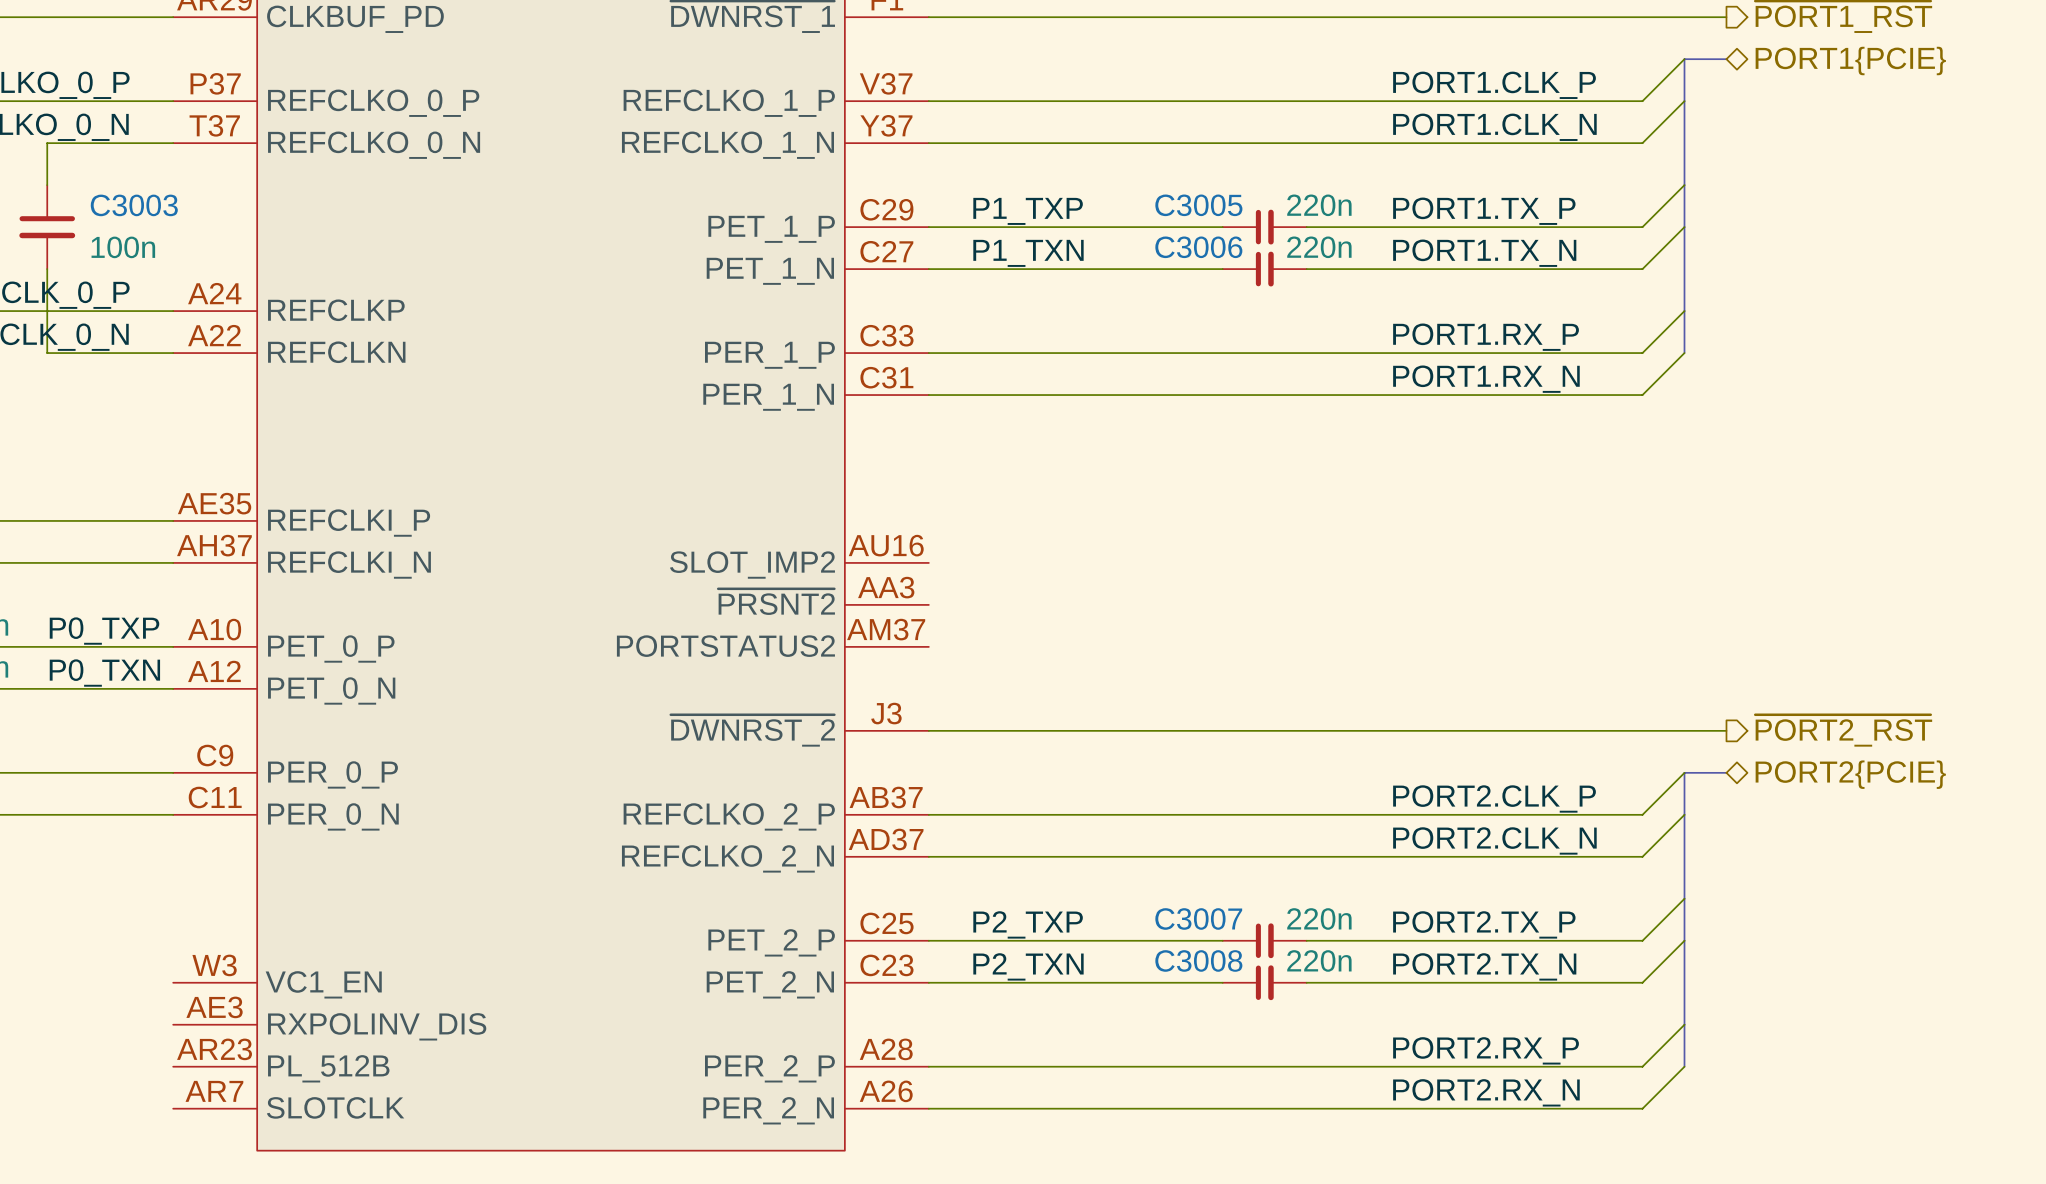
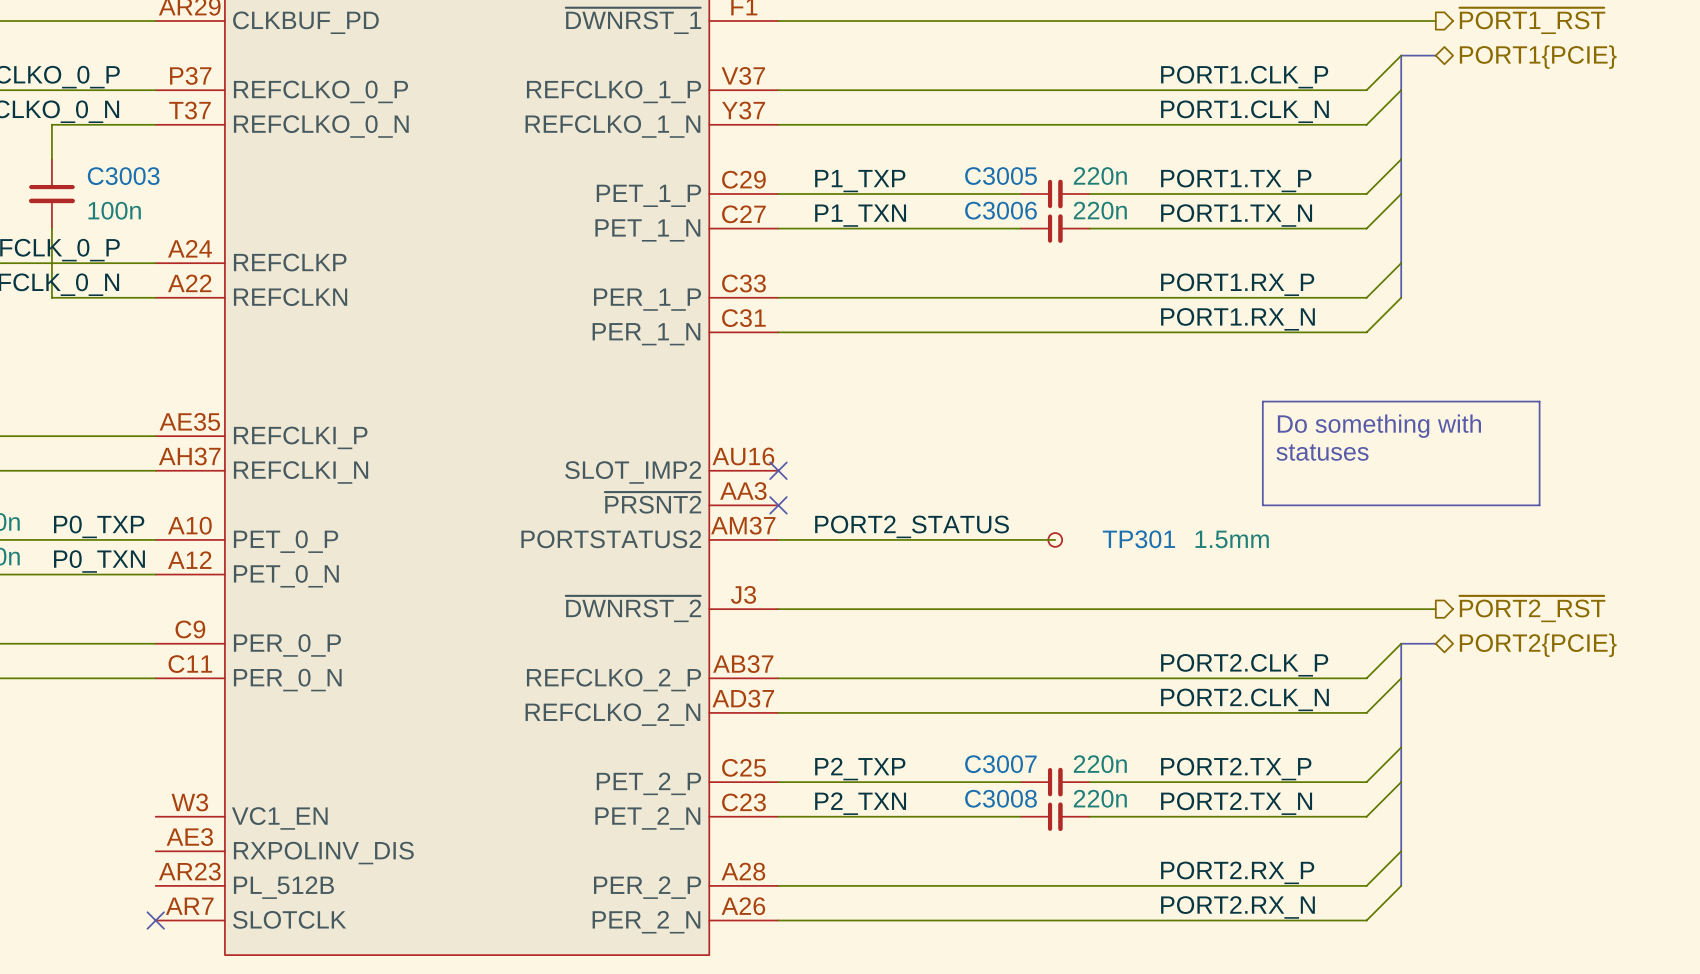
line: none -> (1262, 401) (1539, 401) (1539, 505) (1262, 505) (1262, 401)
text: none -> Do something with (1379, 426)
text: none -> statuses (1322, 452)
no-connect mark: none -> (778, 470)
no-connect mark: none -> (778, 505)
label: none -> PORT2_STATUS (912, 526)
wire: none -> (778, 539) (1055, 539)
TP301: none -> 1.5mm (1055, 539)
no-connect mark: none -> (155, 920)

